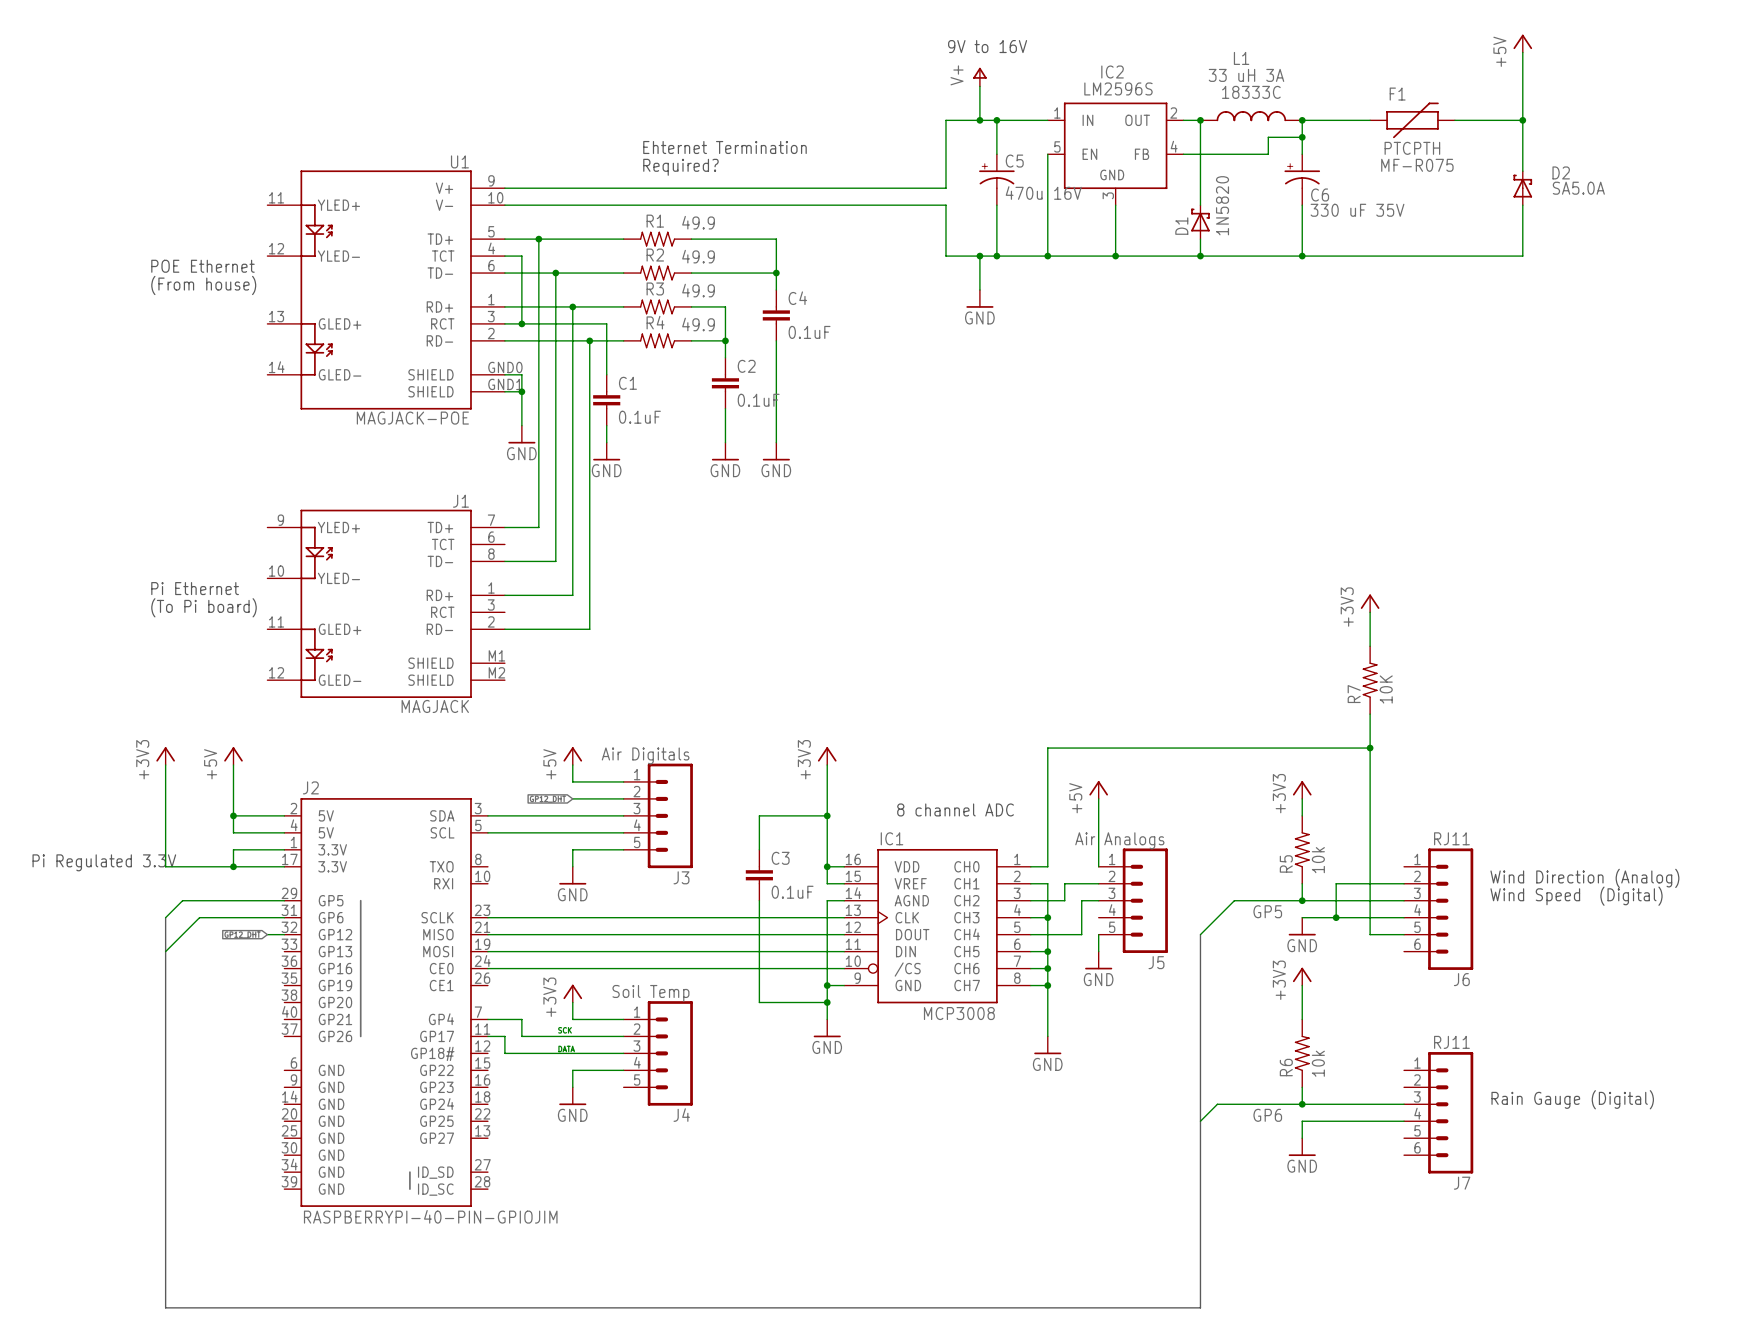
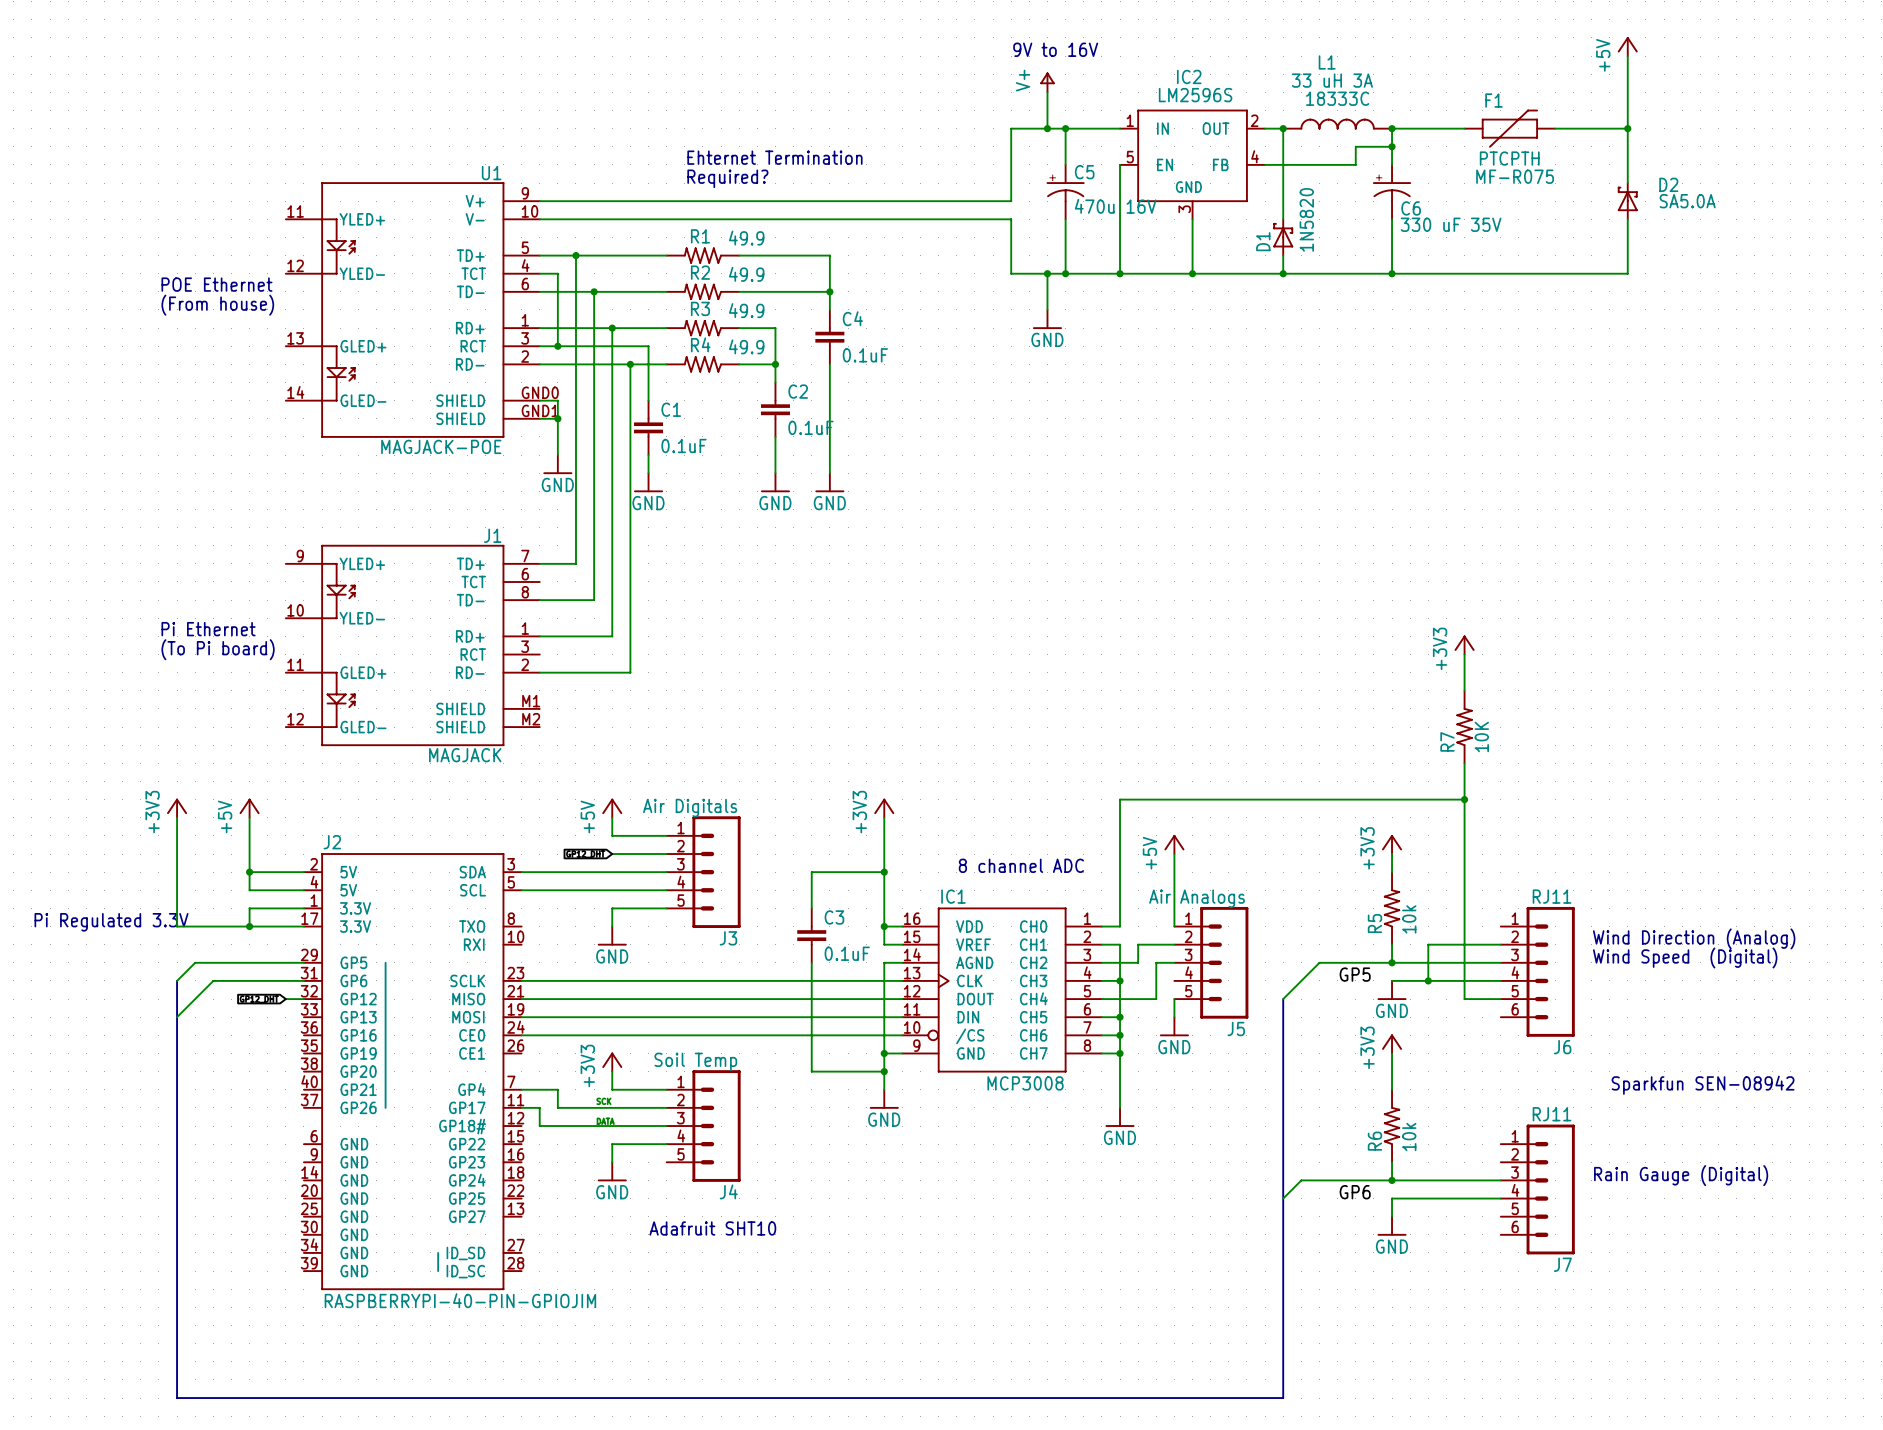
text: none -> Sparkfun SEN-08942 (1703, 1085)
text: none -> Adafruit SHT10 (712, 1228)

